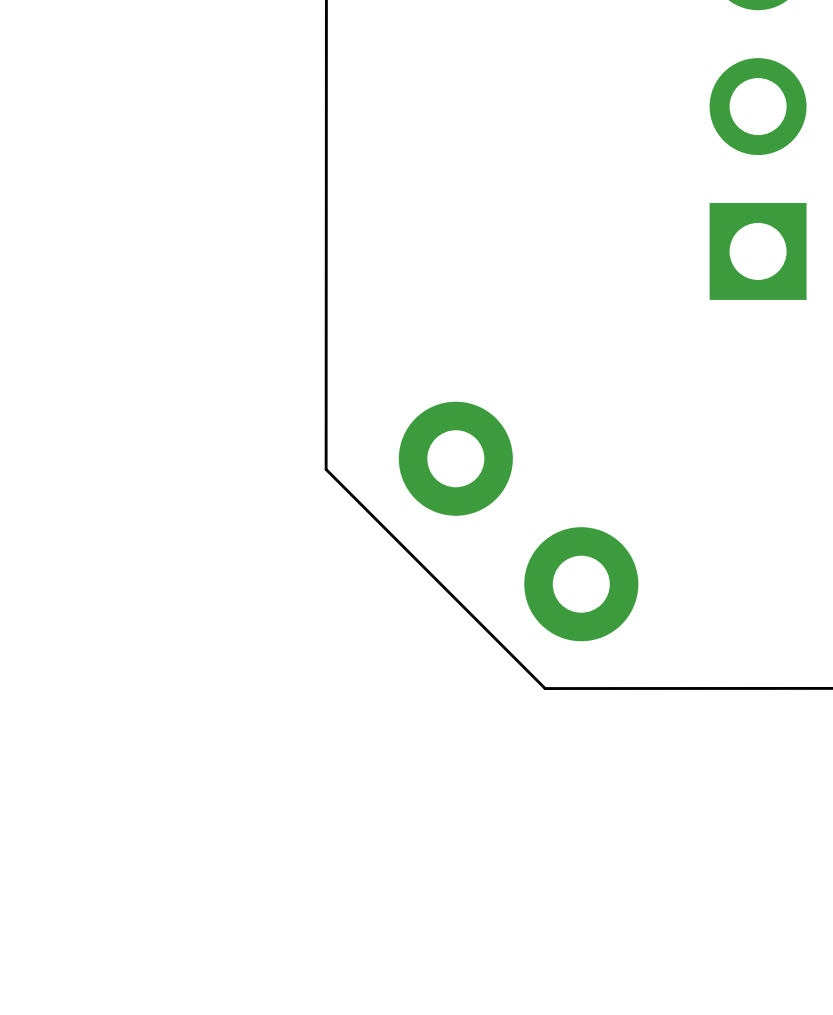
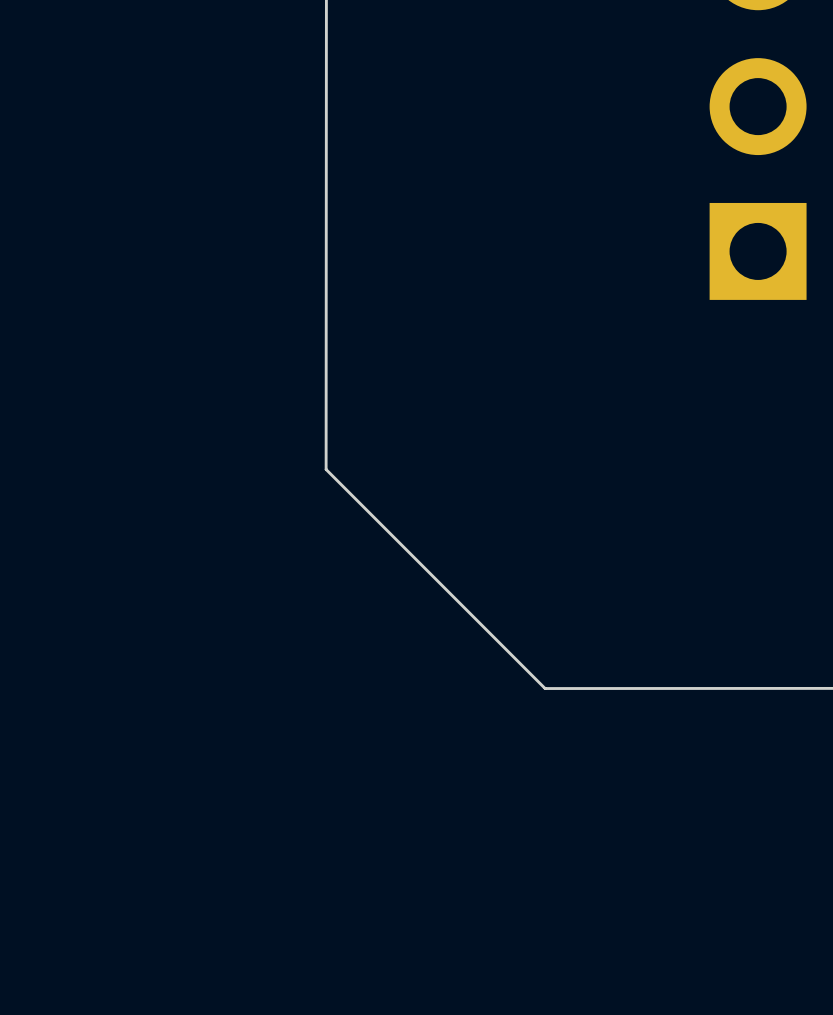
part: (455, 458) -> none
part: (581, 584) -> none

